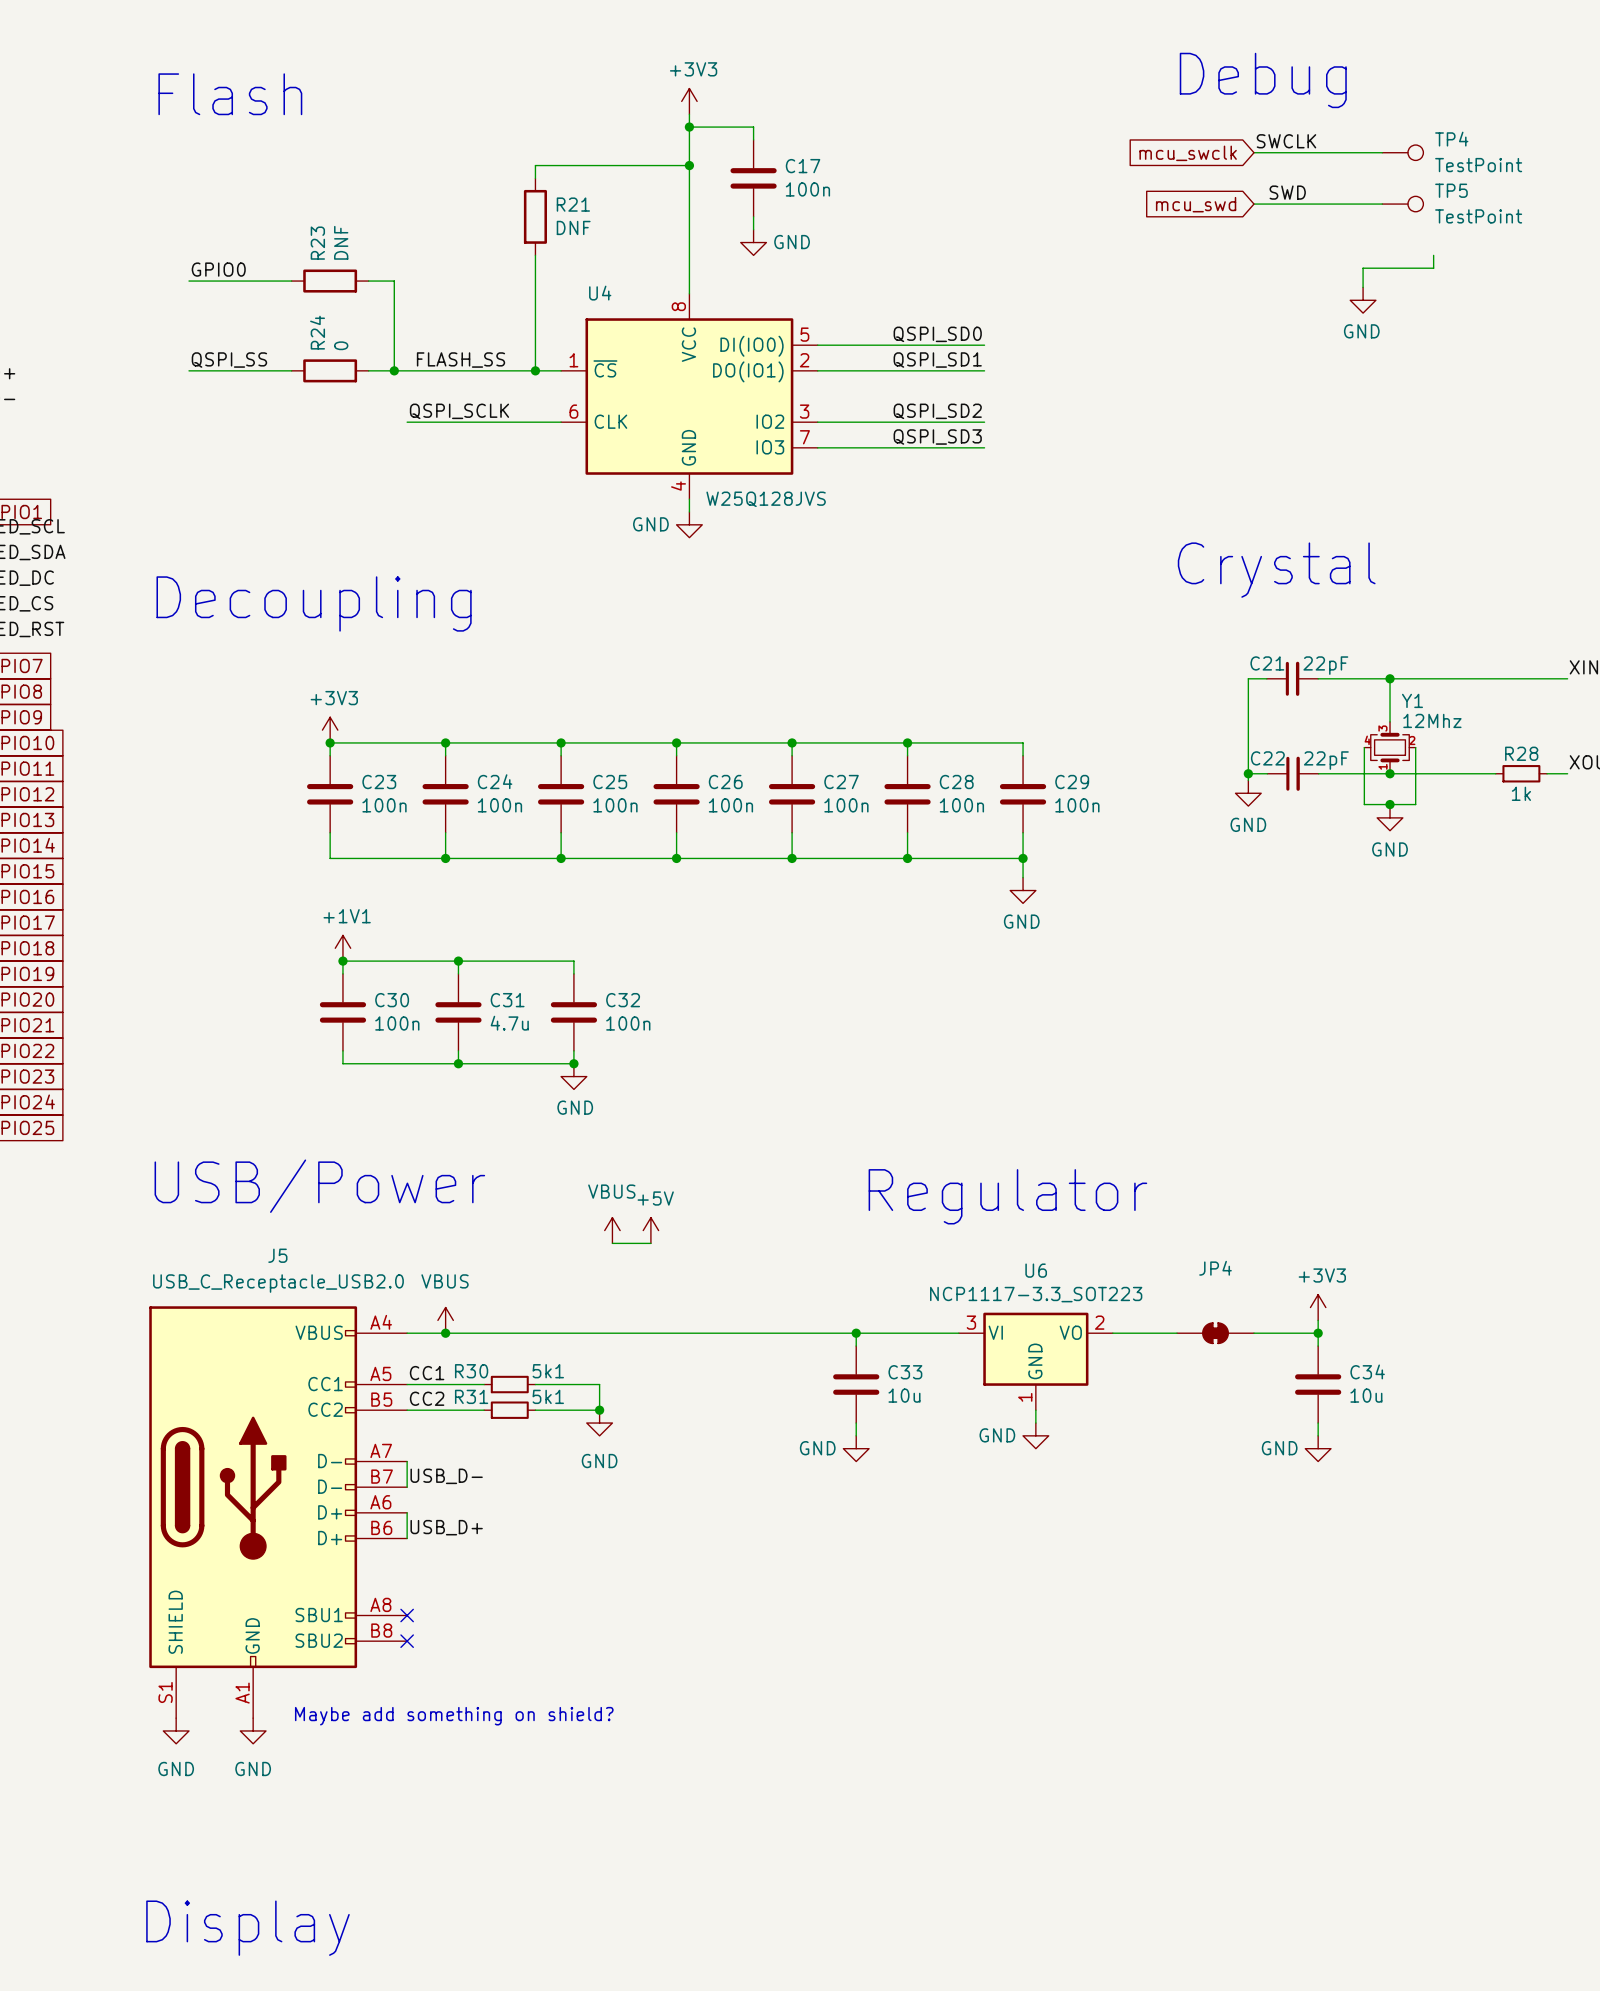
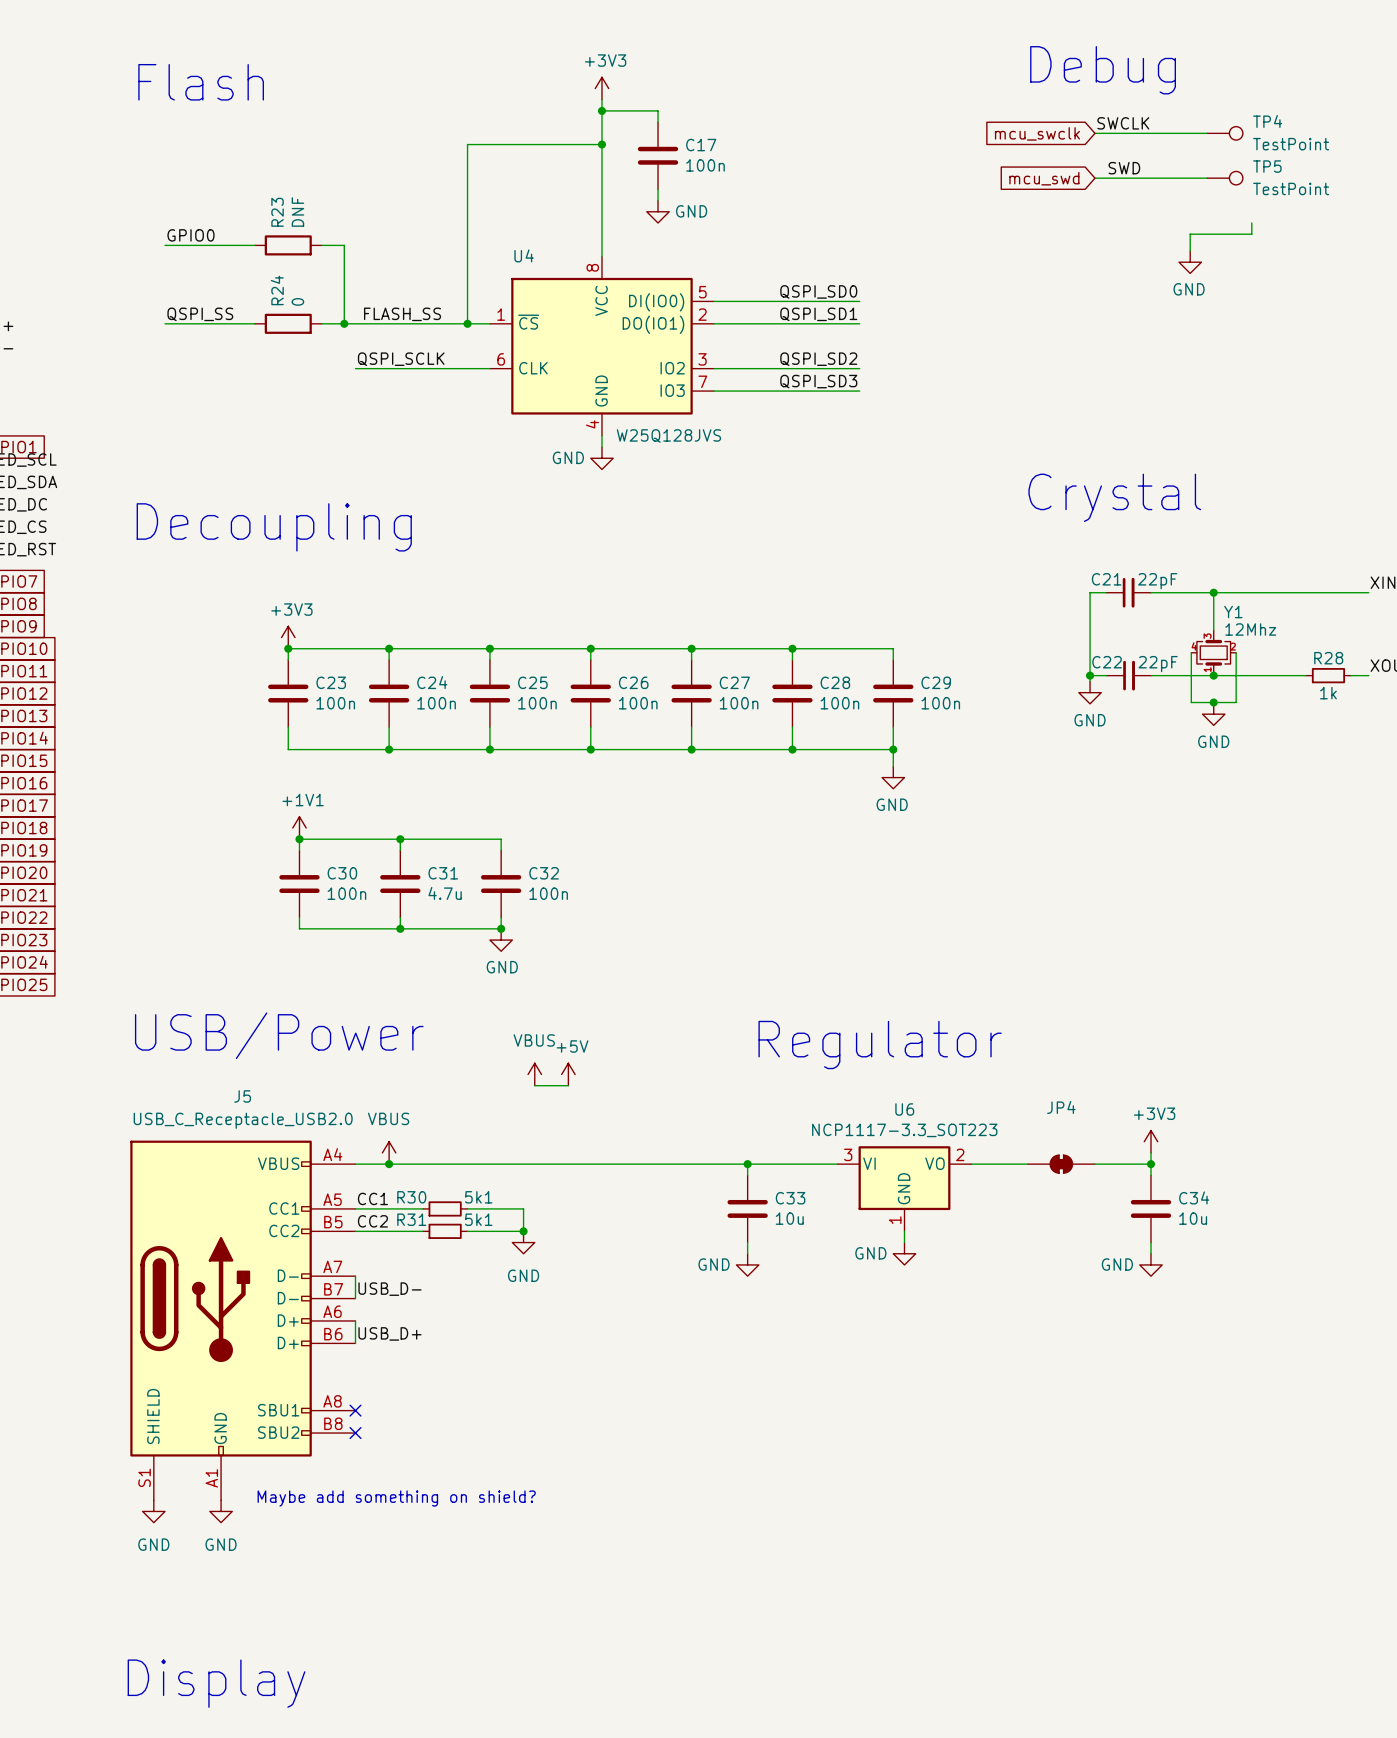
wire: none -> (467, 155) (467, 222)
R21: DNF (535, 216) -> none

